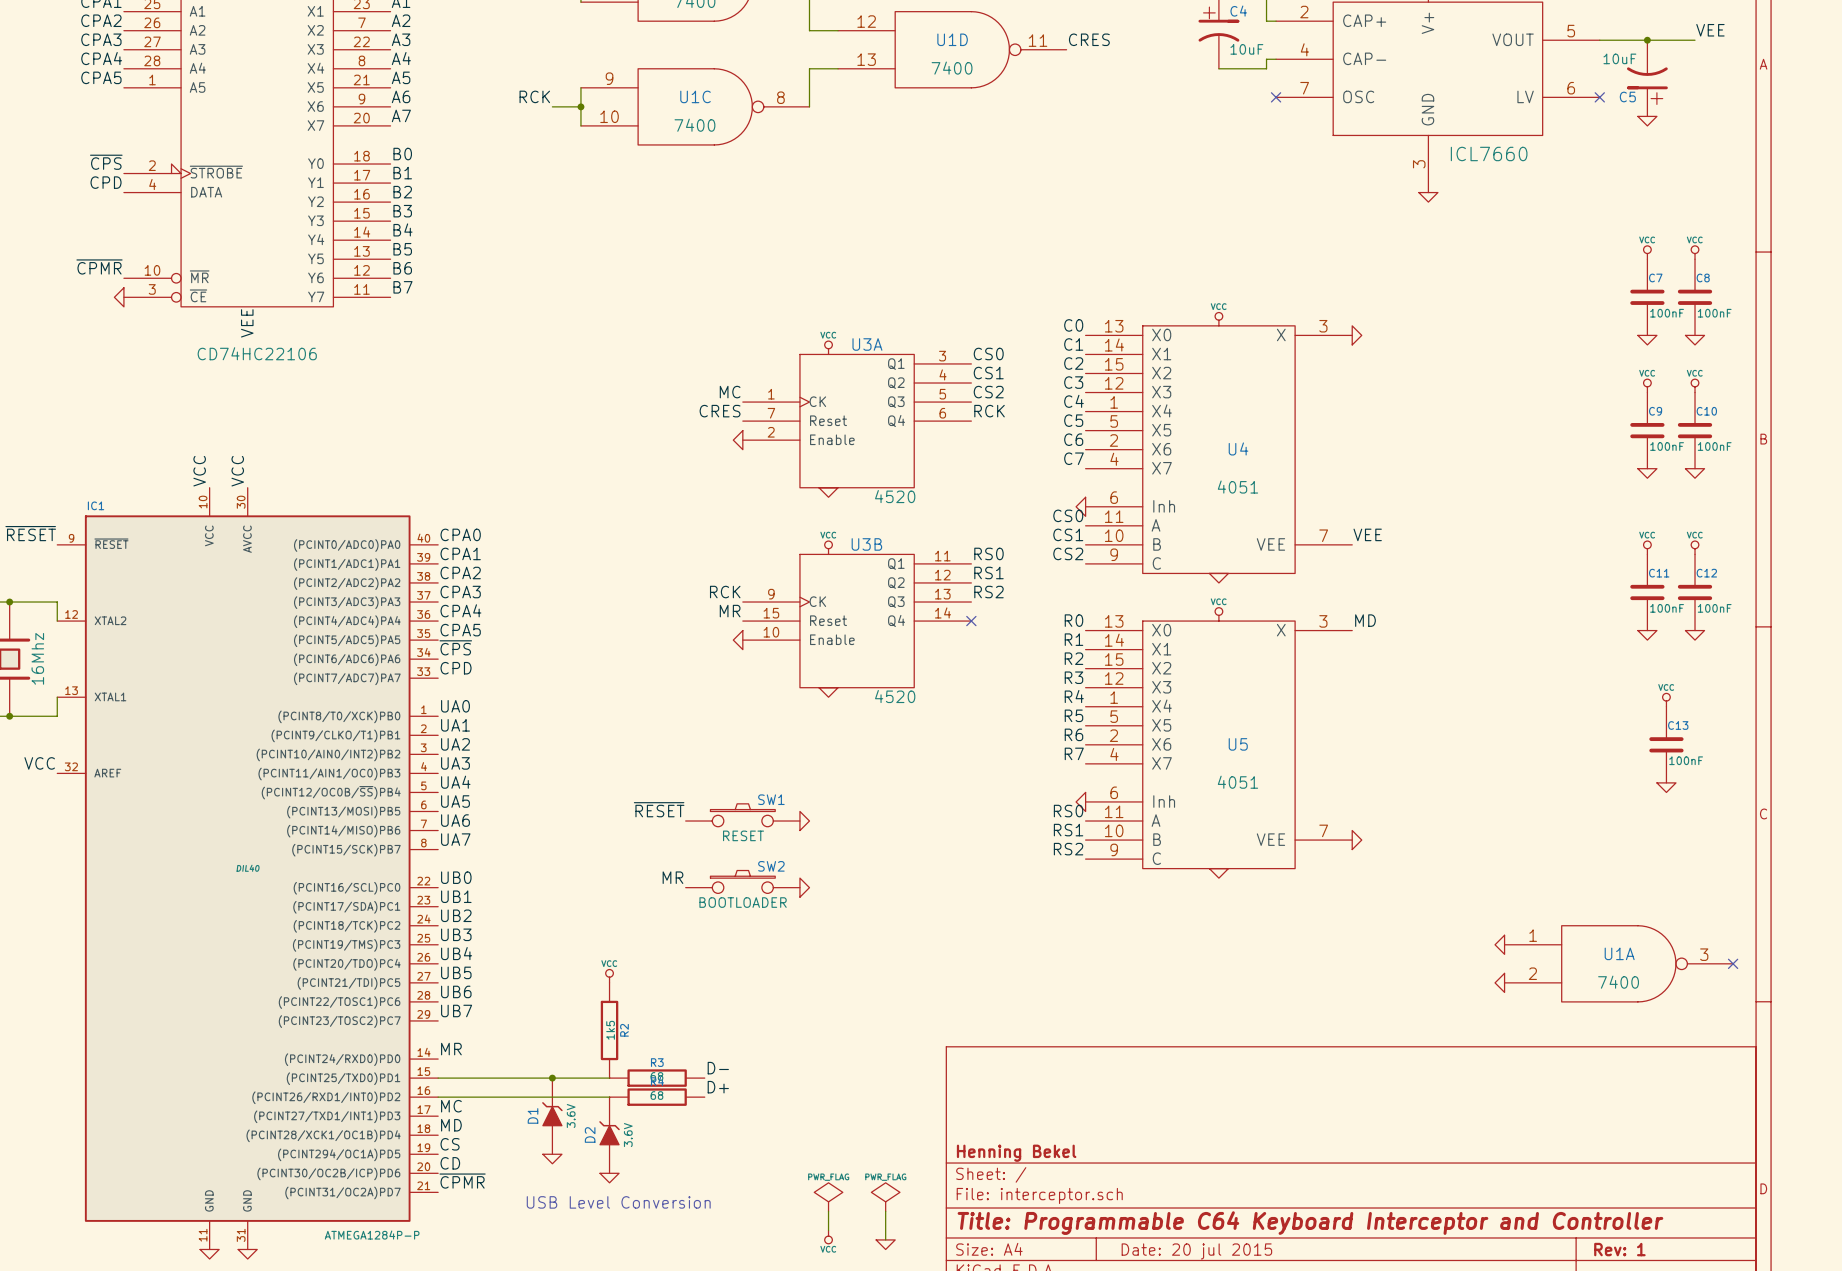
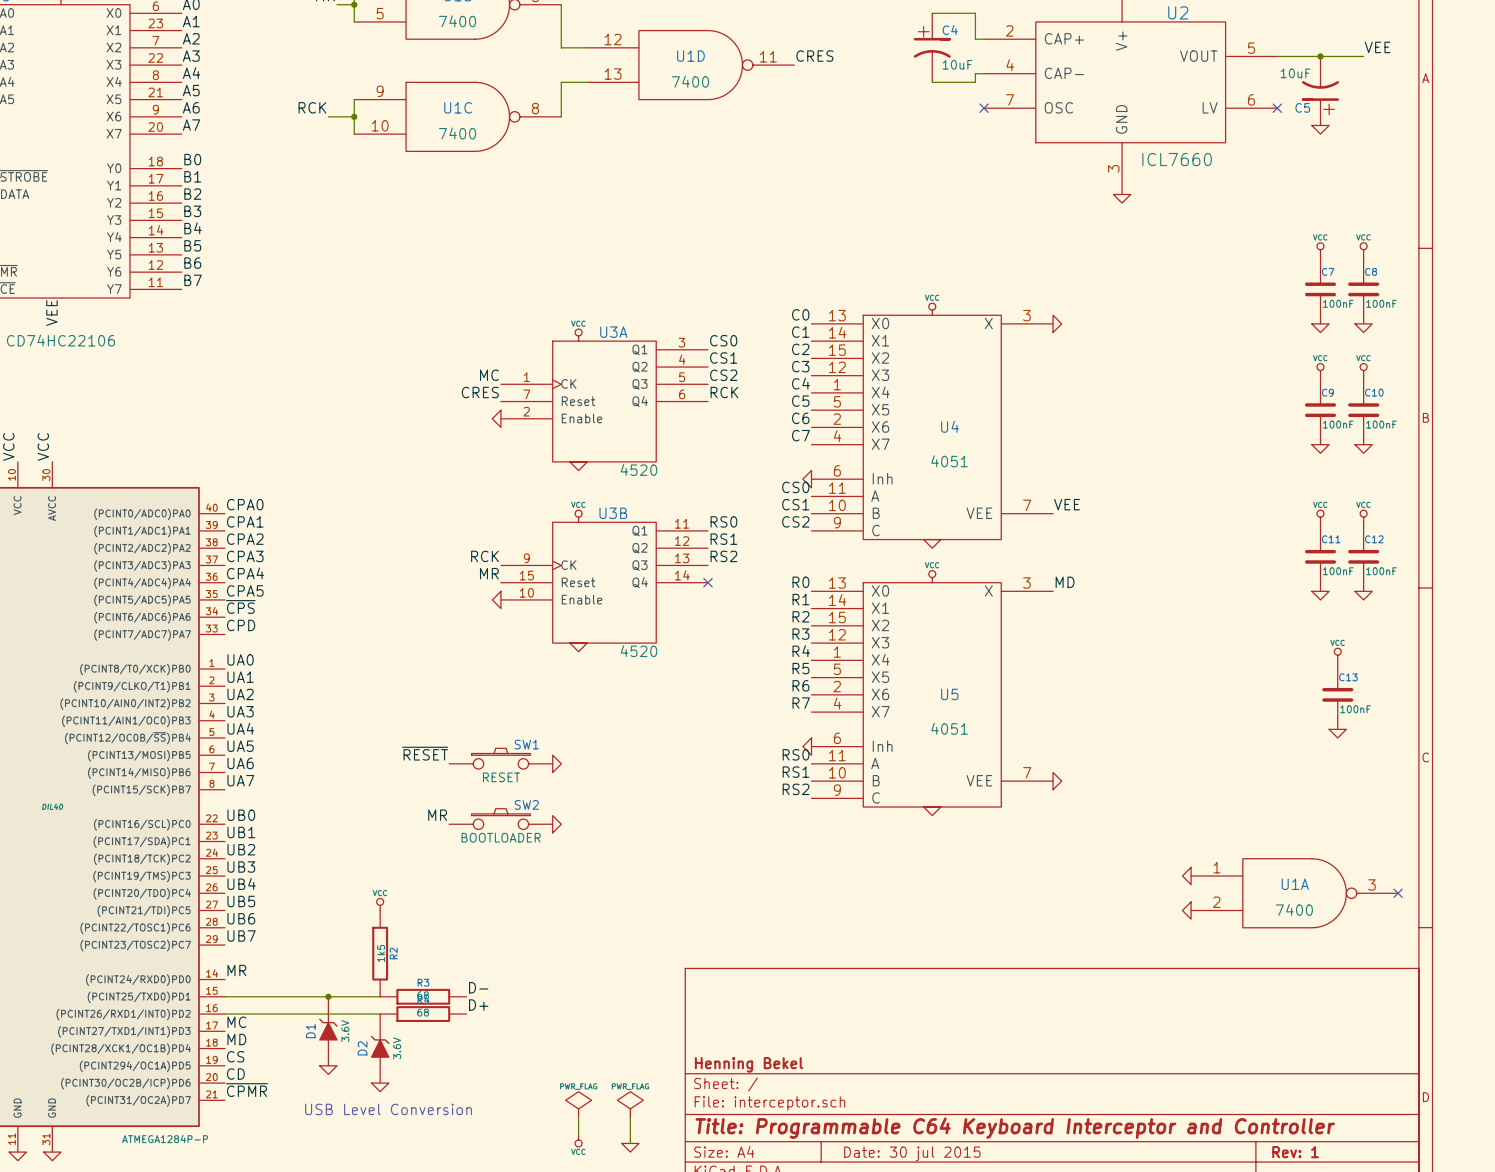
title block: Date: 20 jul 2015 (1196, 1251) -> Date: 30 jul 2015 (912, 1153)

